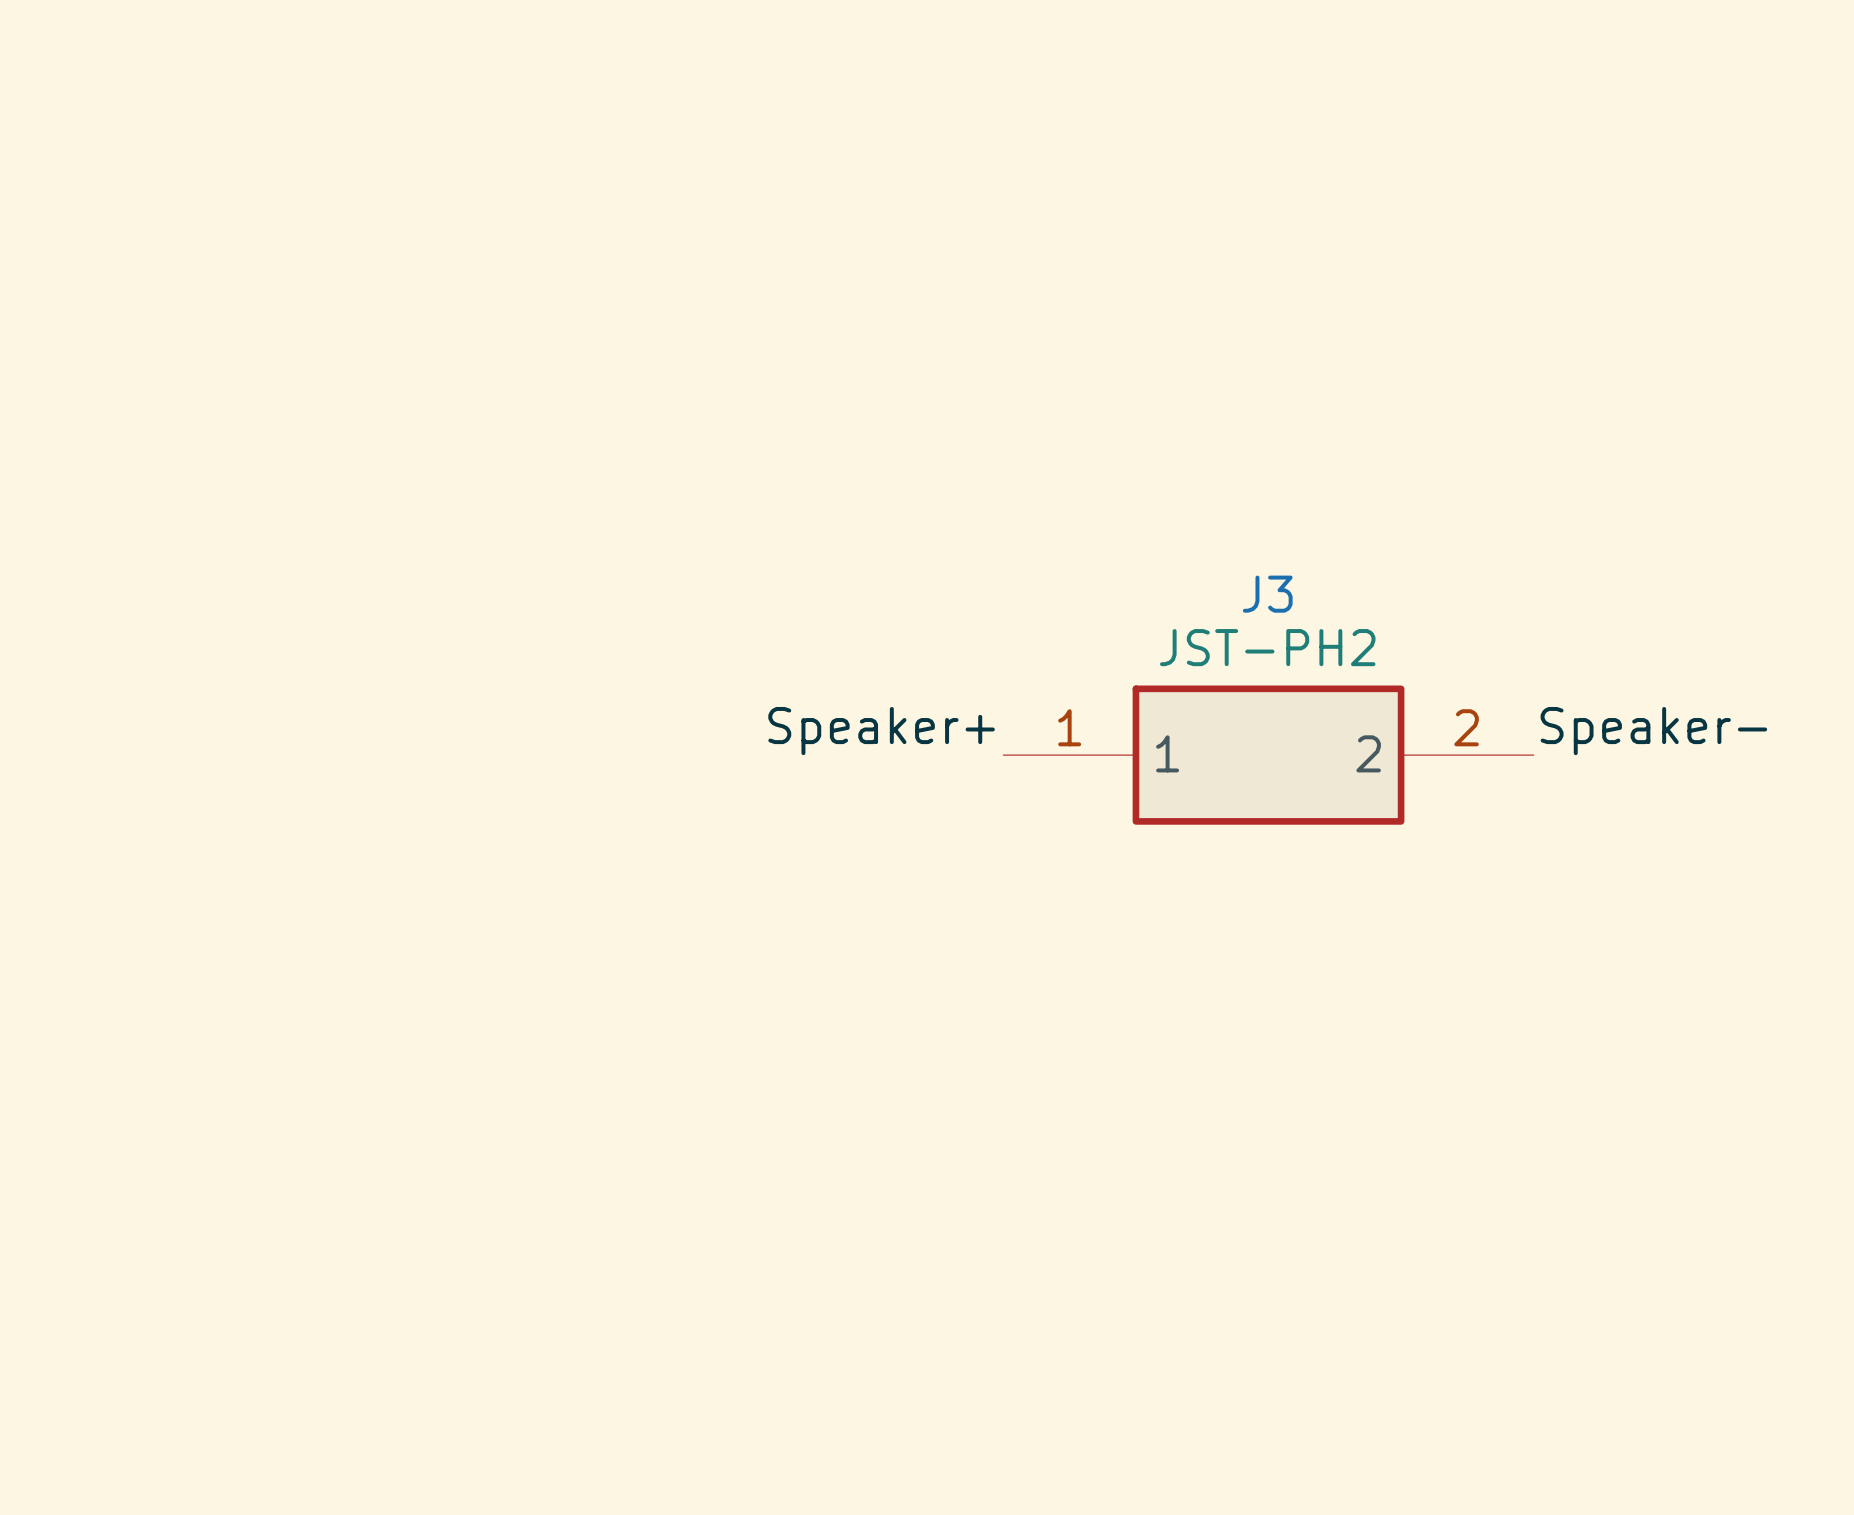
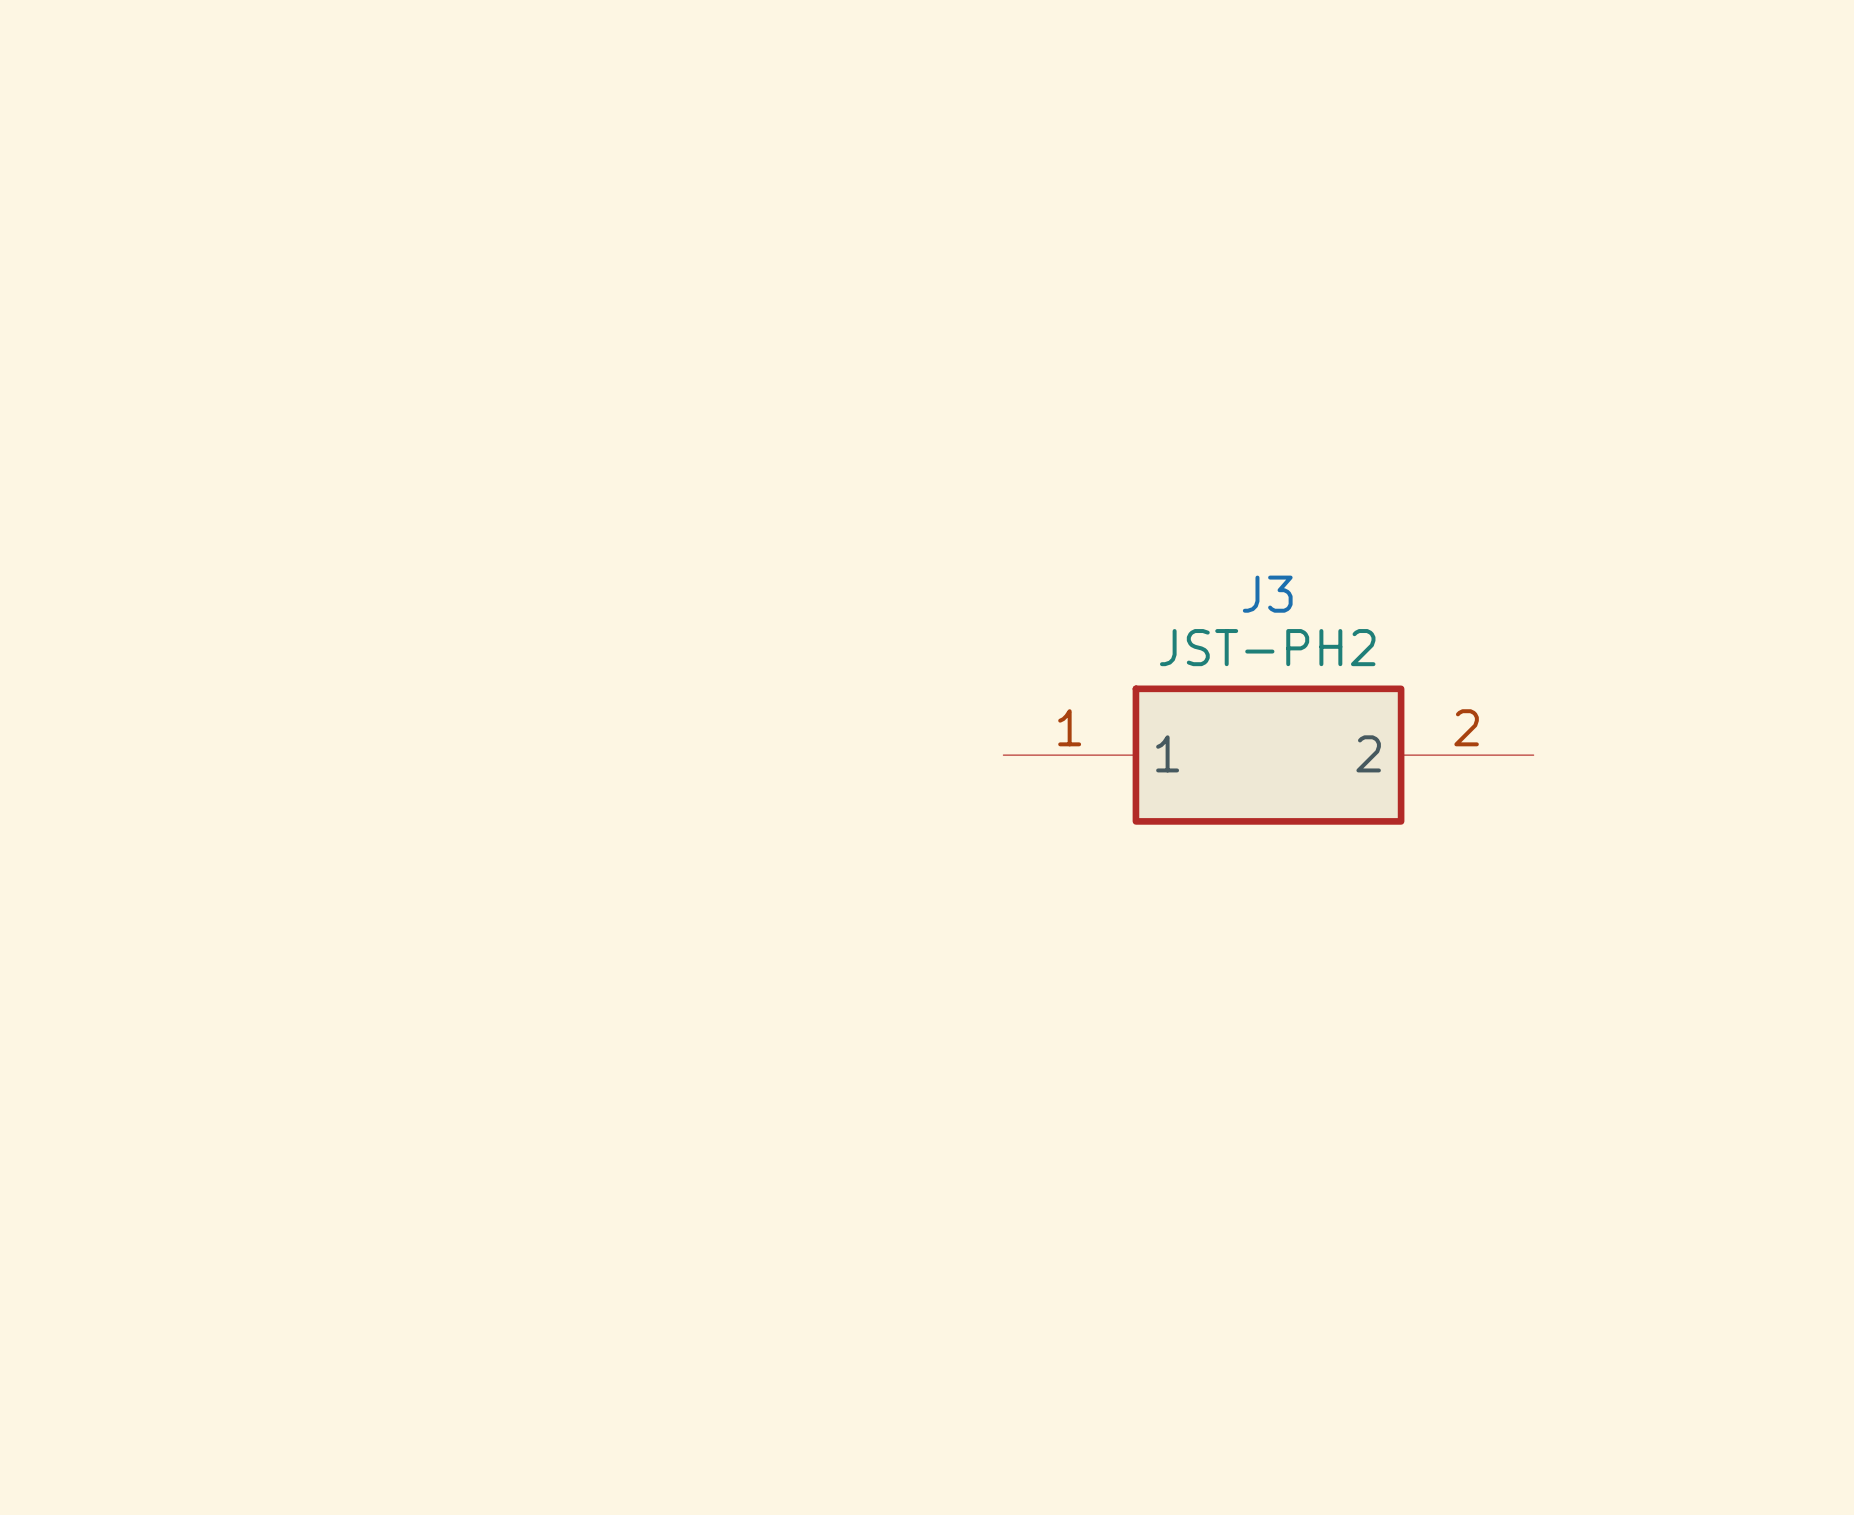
label: Speaker+ (881, 731) -> none
label: Speaker- (1653, 731) -> none

